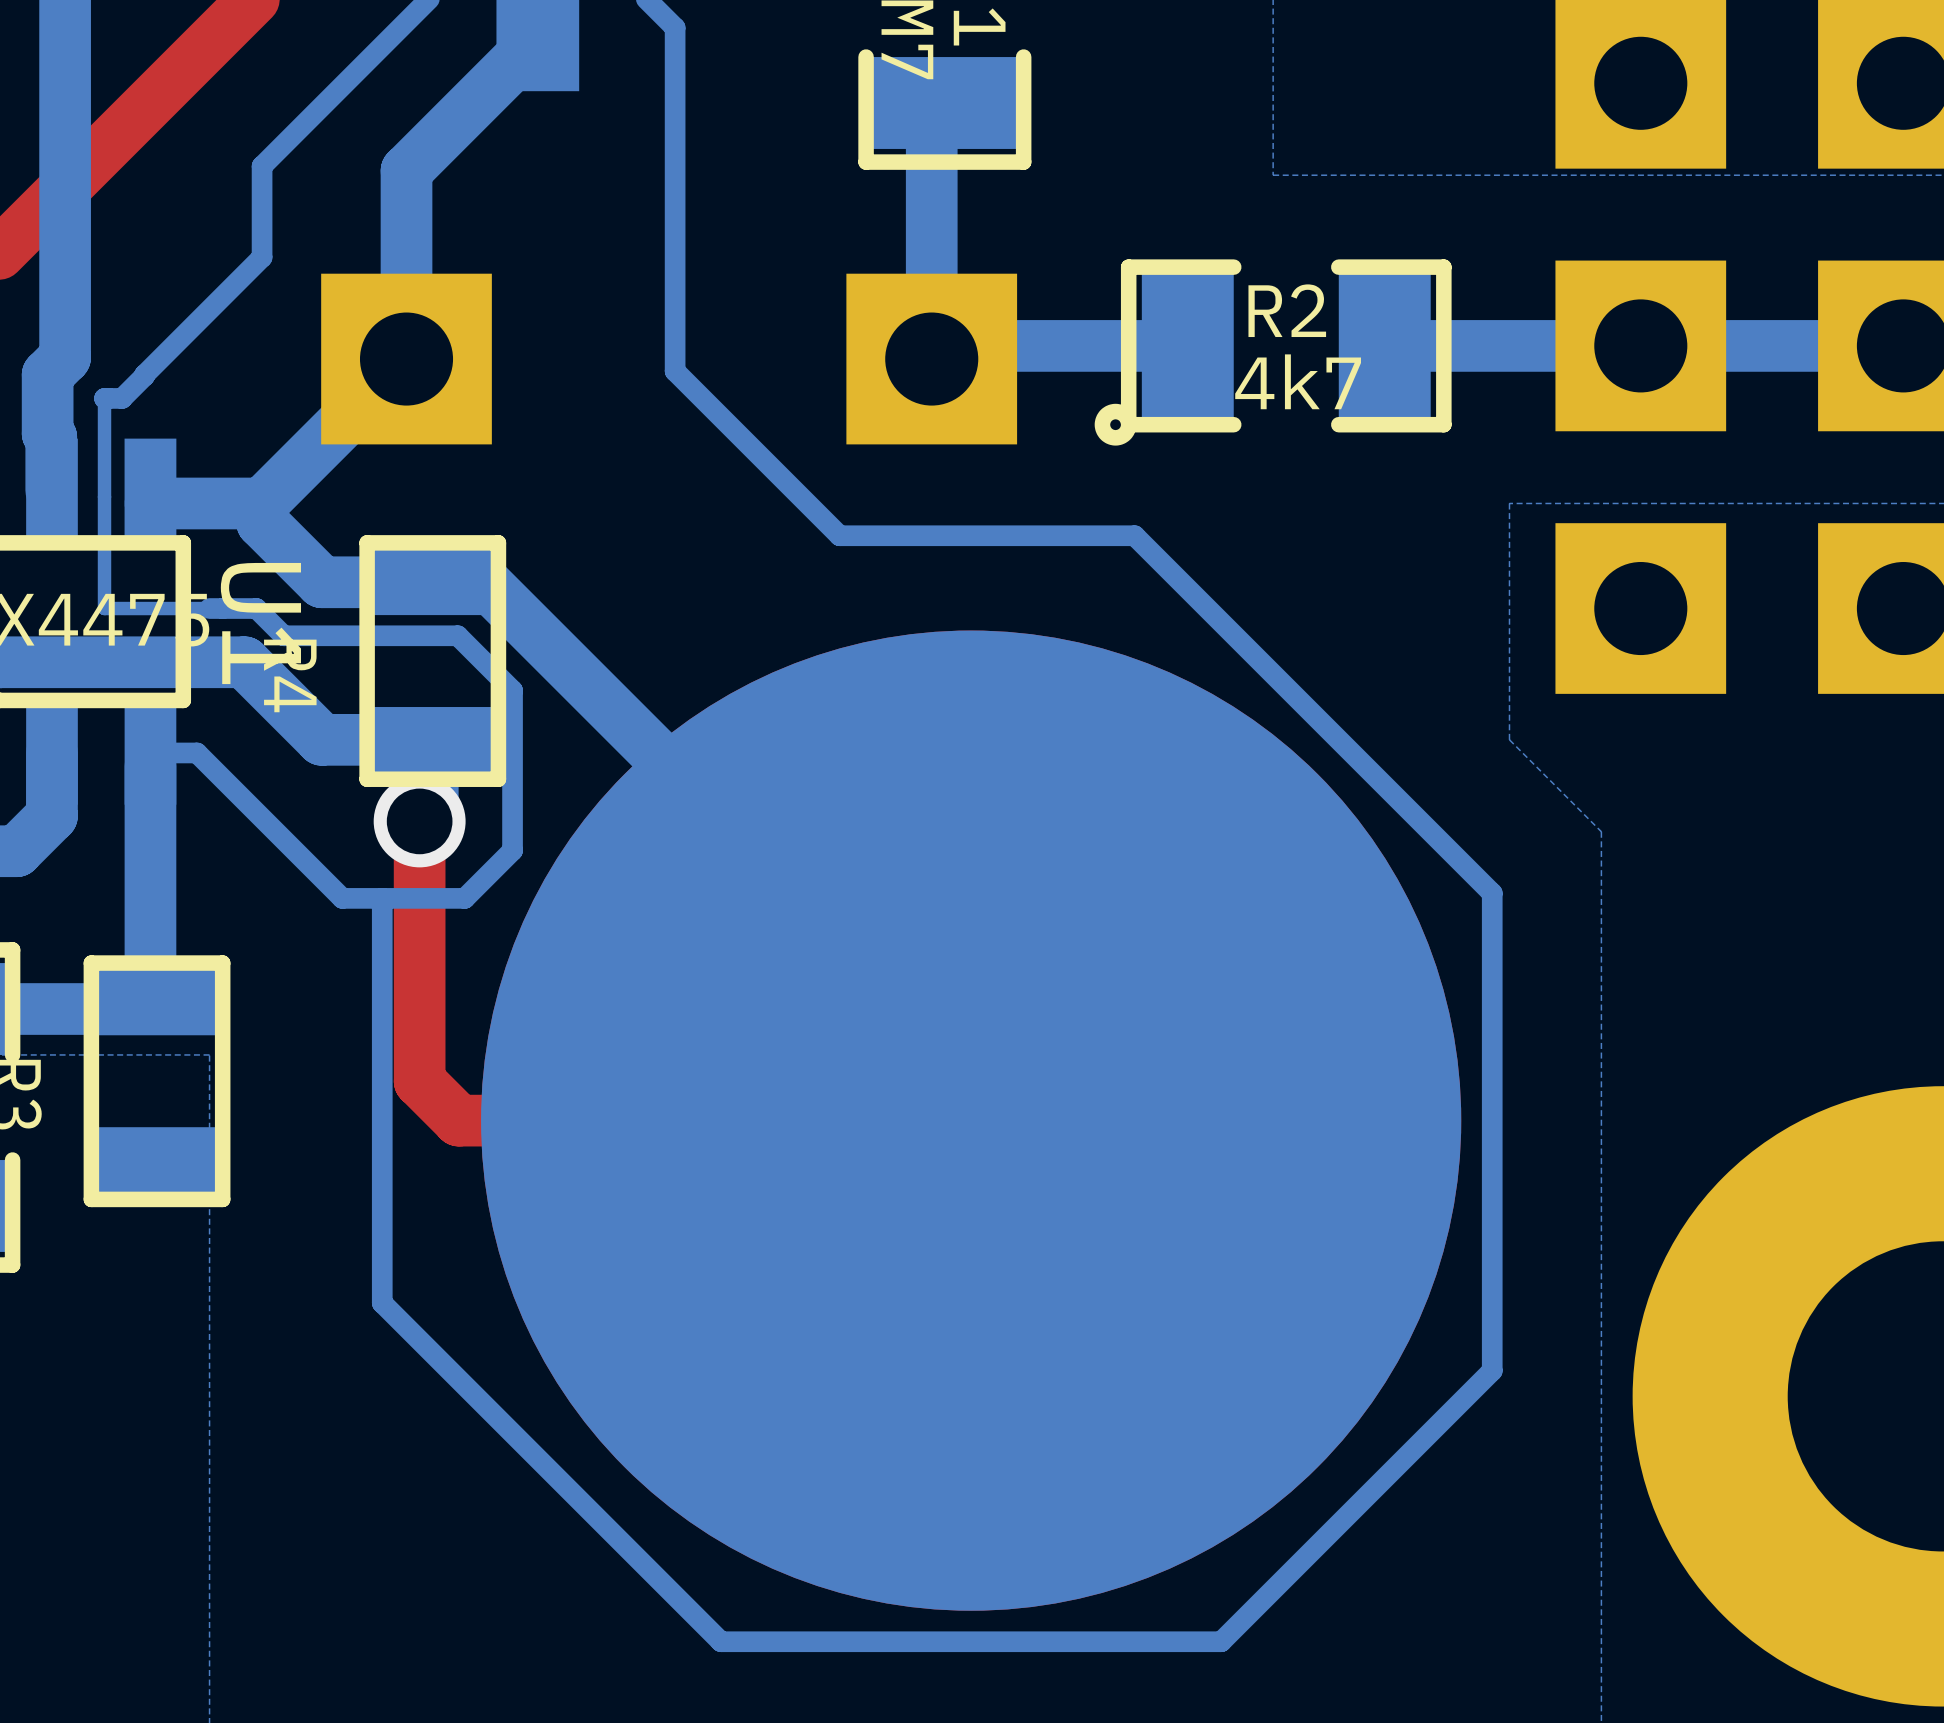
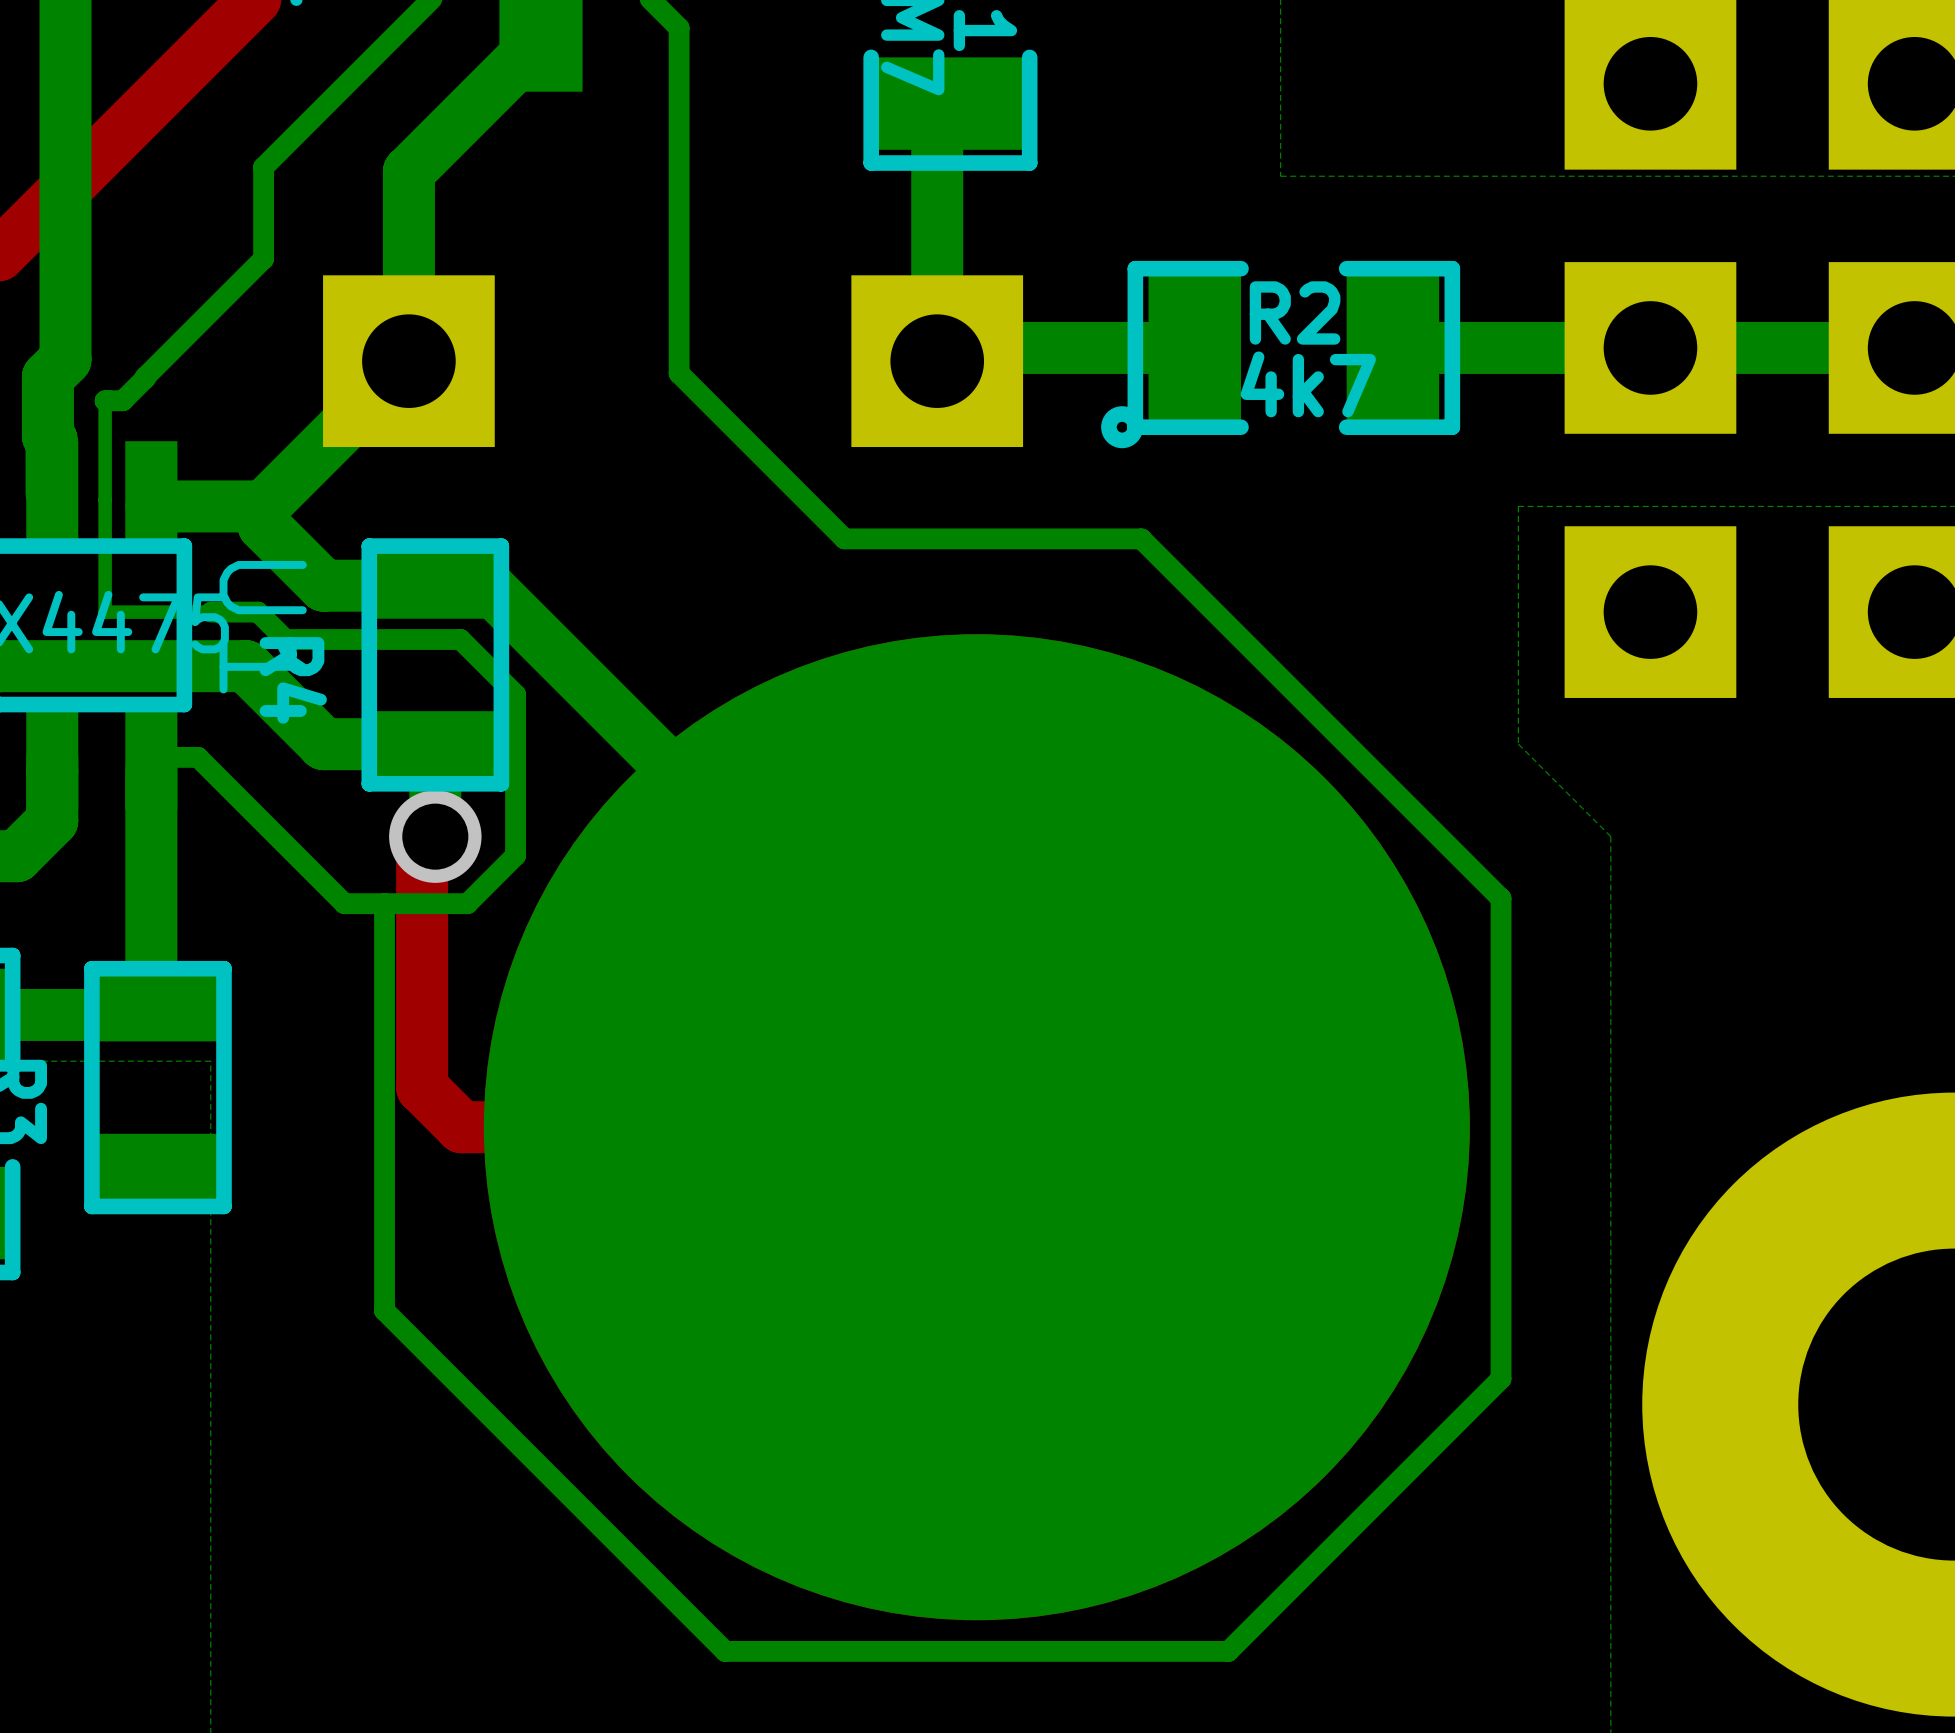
via position: (419, 821) -> (435, 836)

